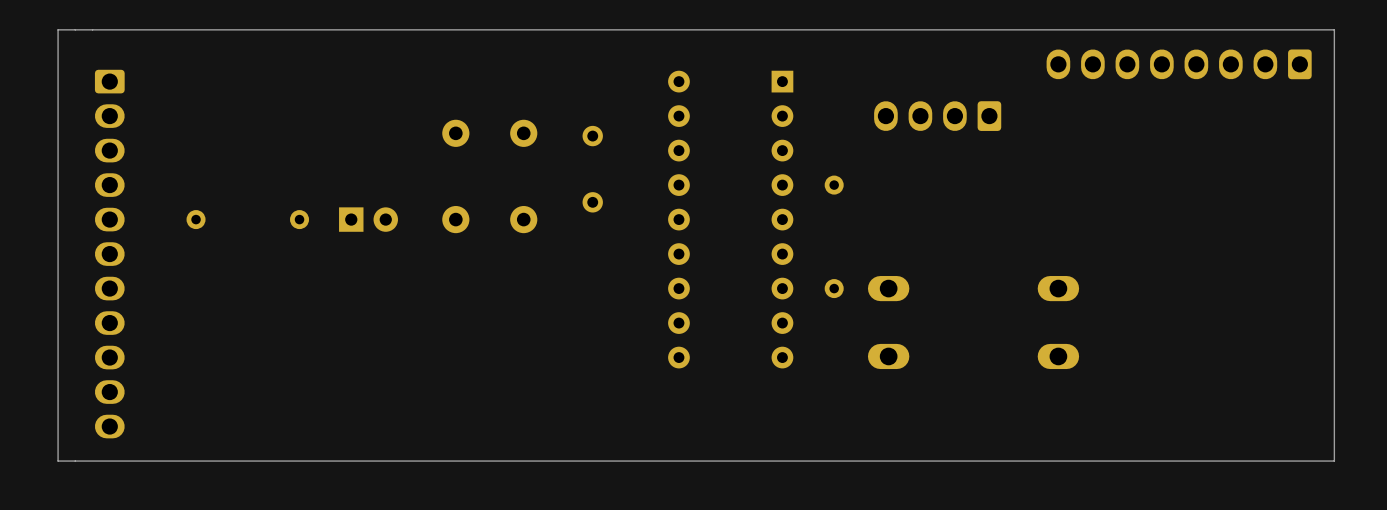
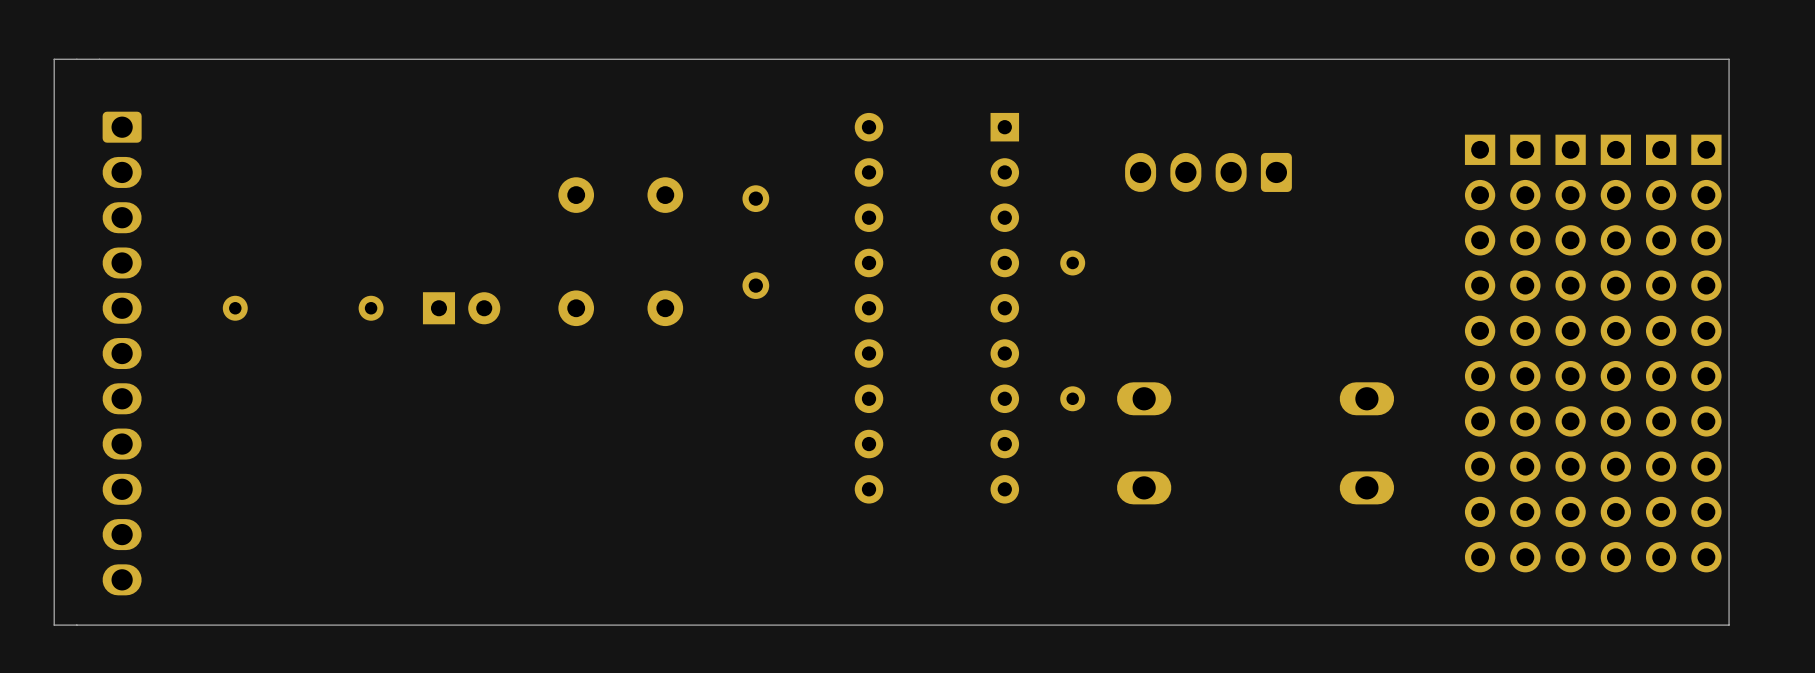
part: (1179, 64) -> none
part: none -> (1480, 353)
part: none -> (1525, 353)
part: none -> (1570, 353)
part: none -> (1615, 353)
part: none -> (1661, 353)
part: none -> (1706, 353)

